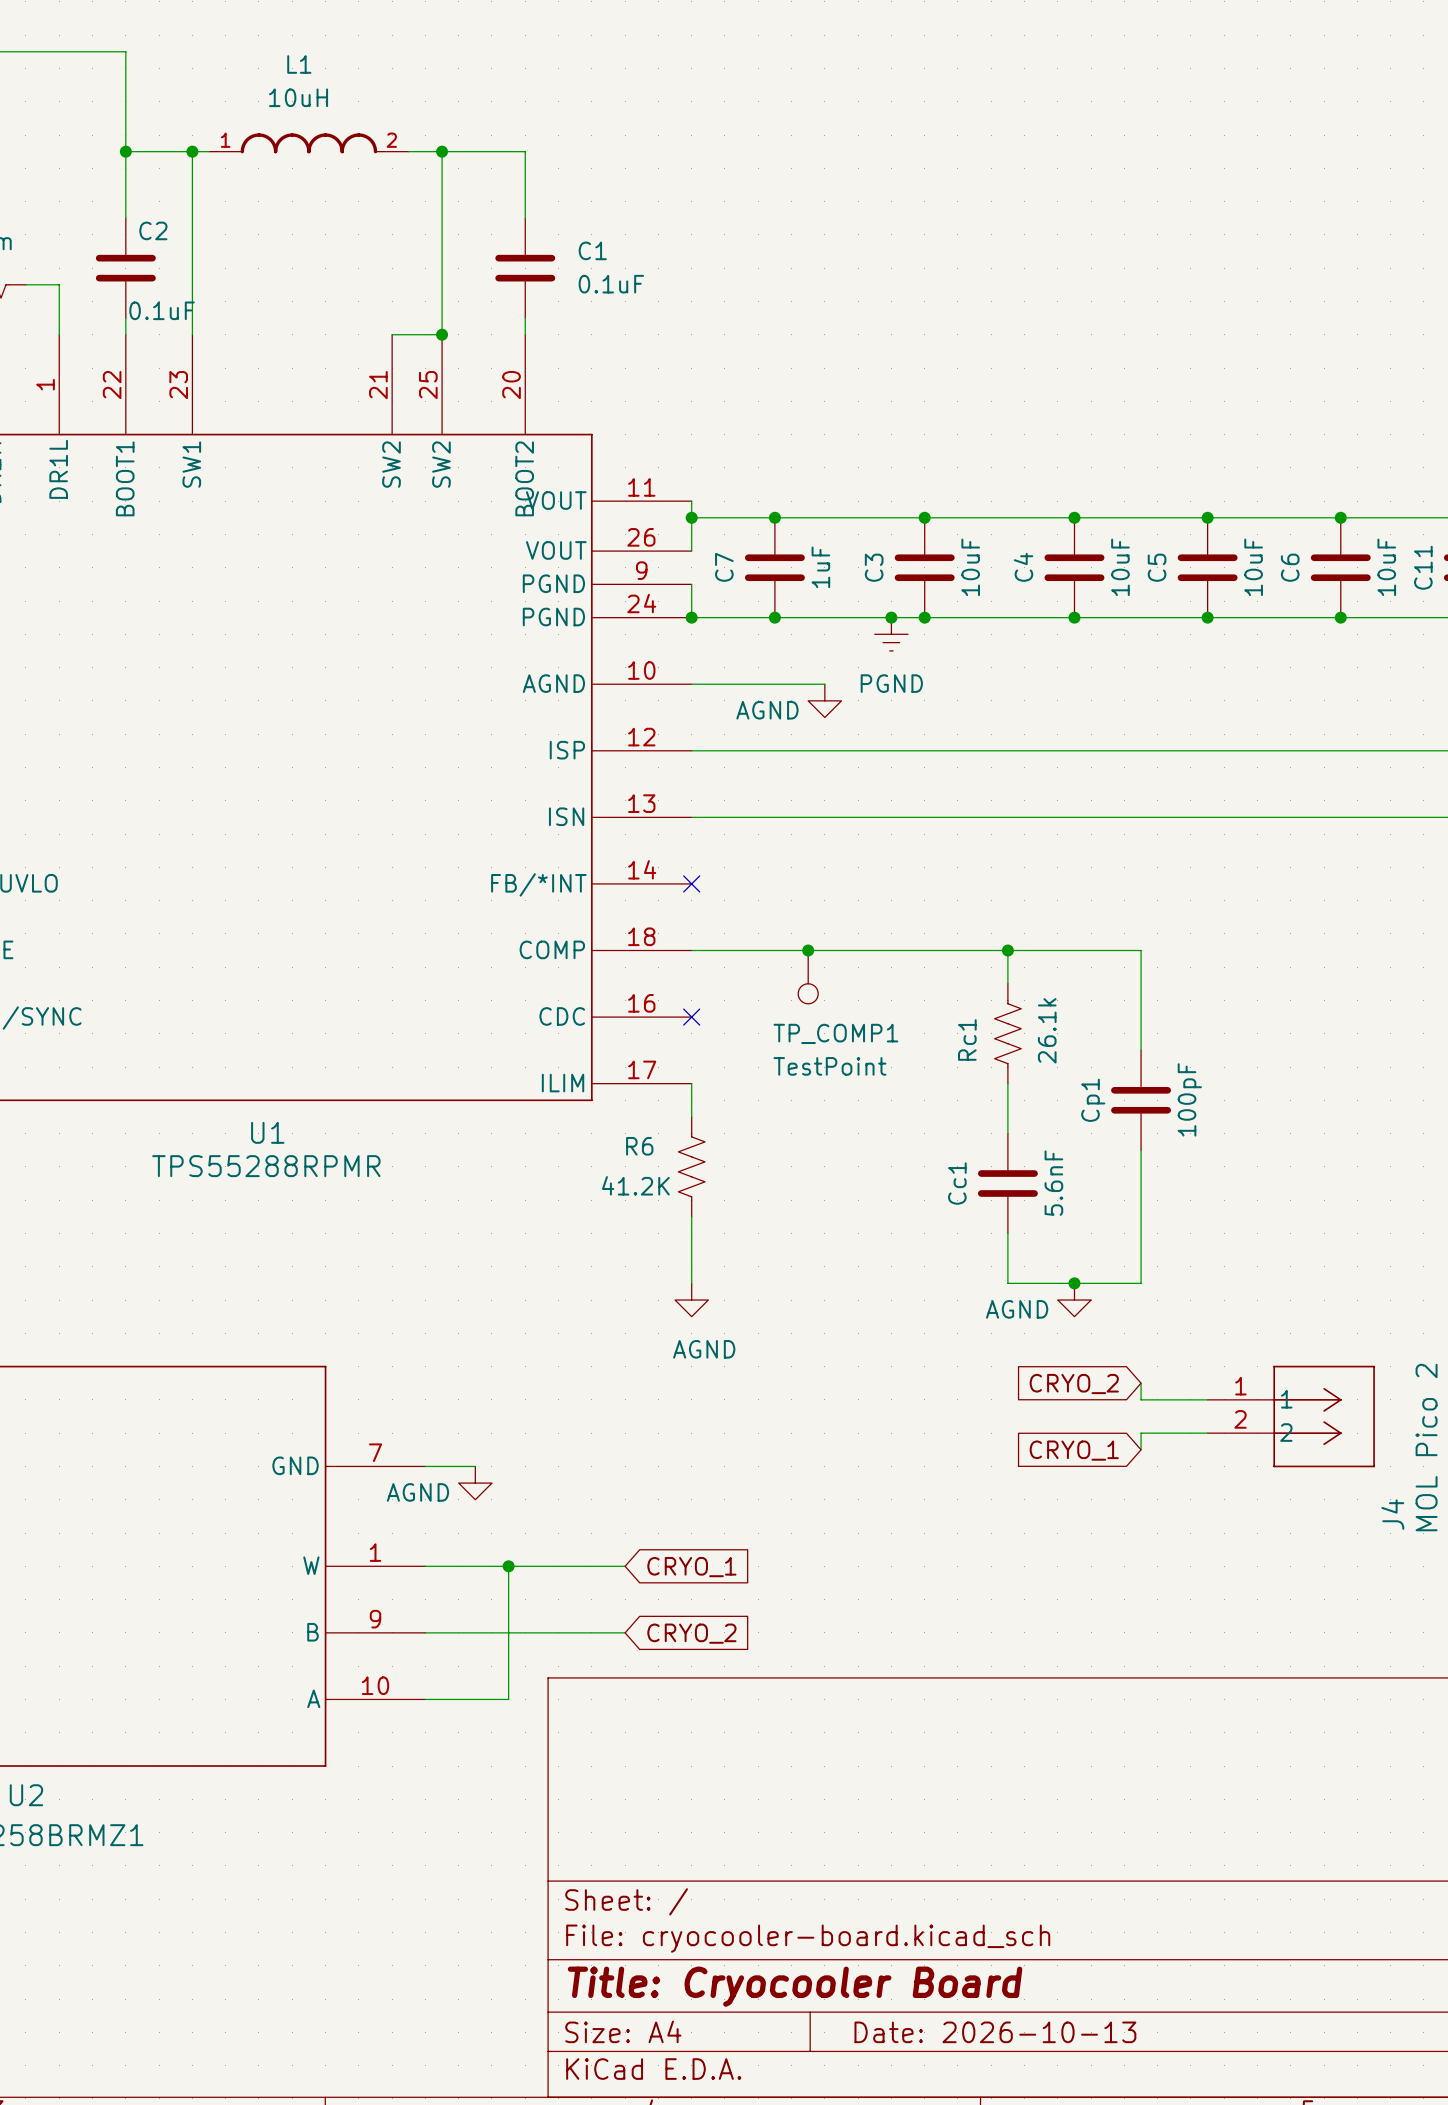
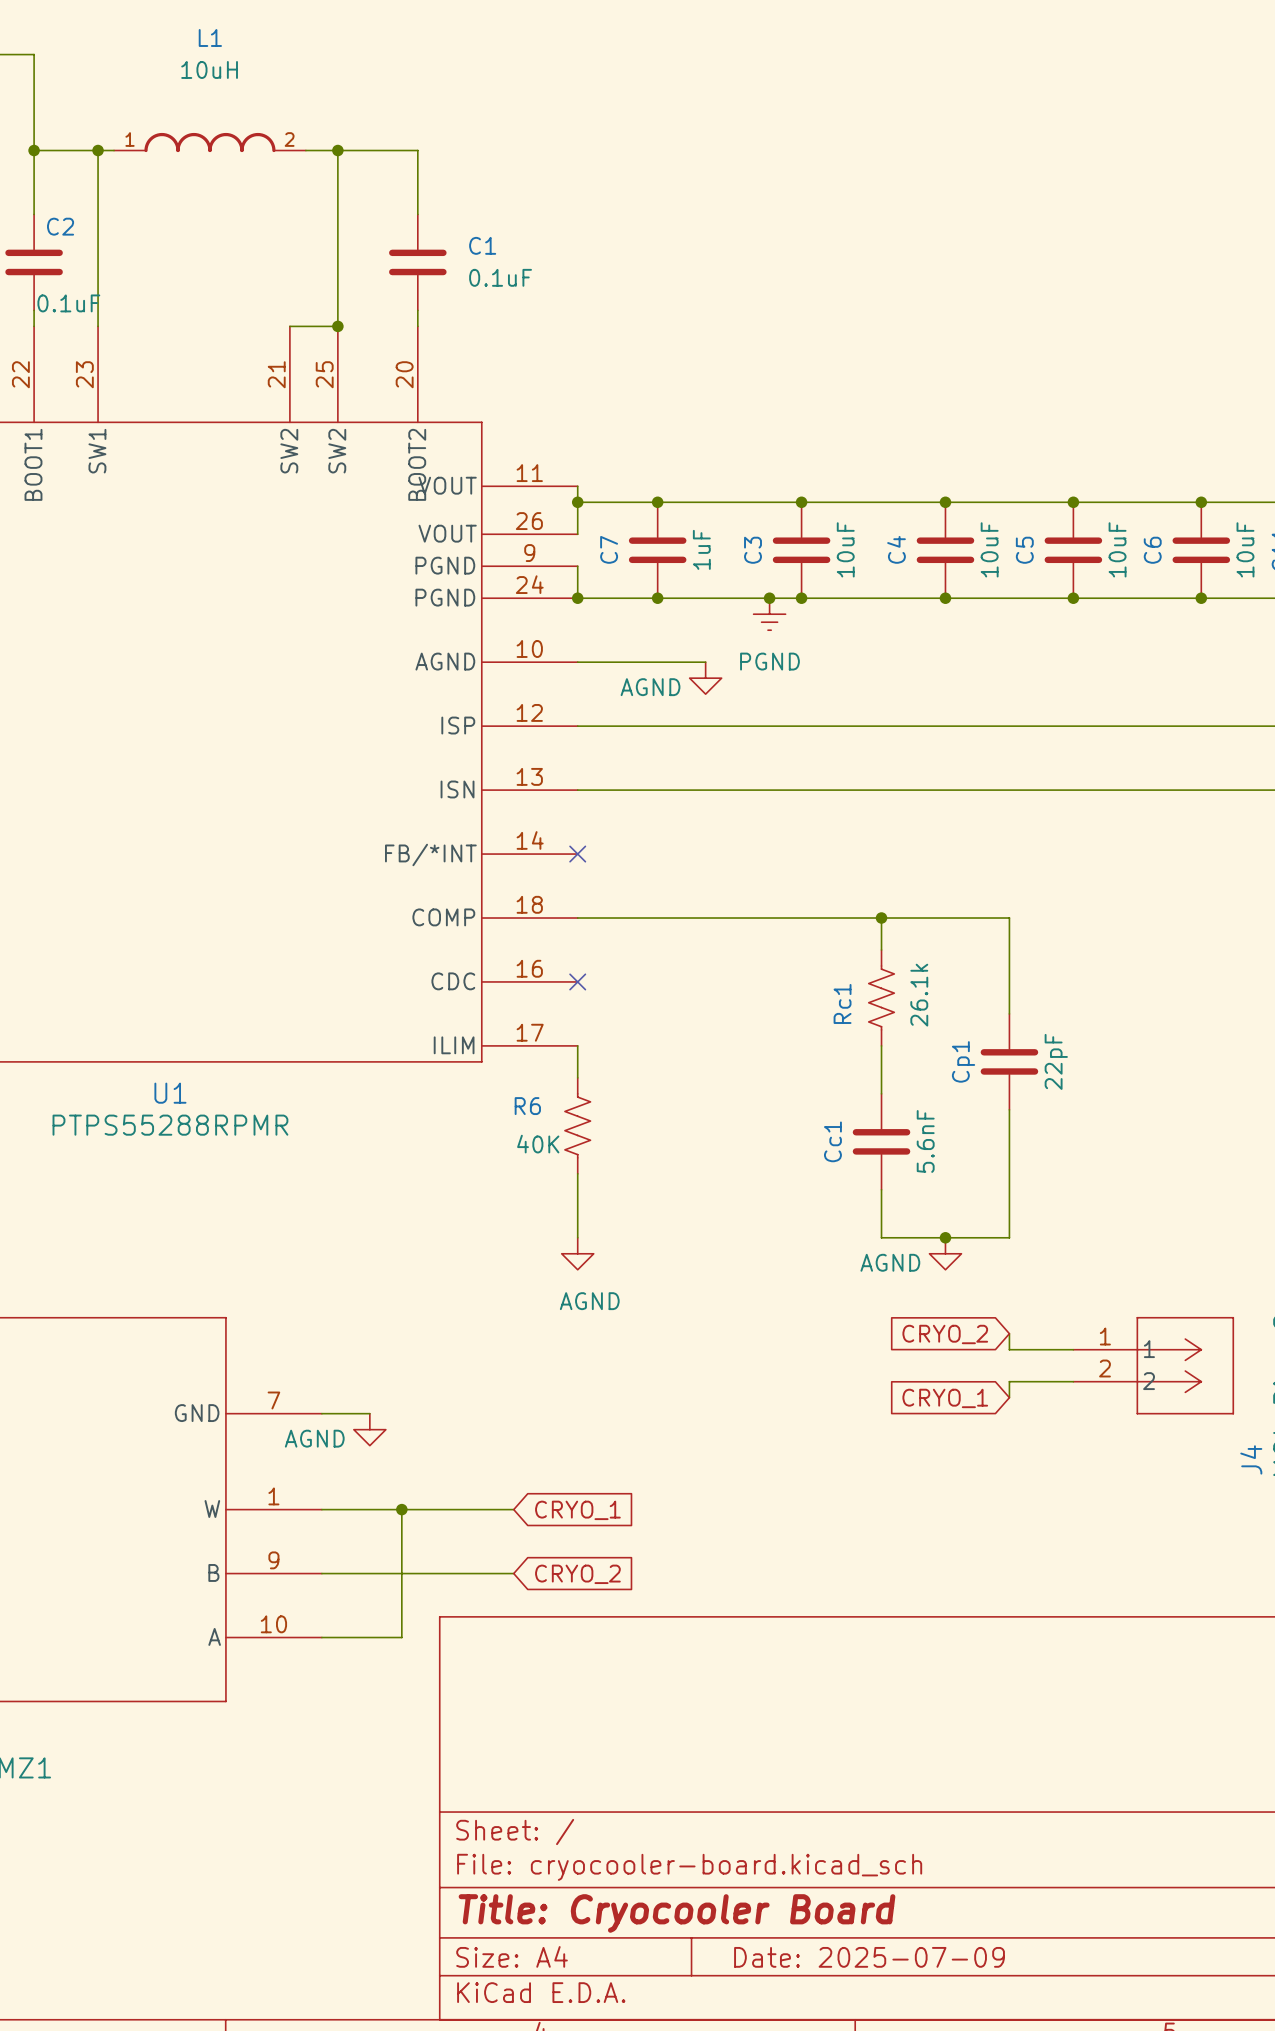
L1 name position: L1 (299, 64) -> L1 (210, 37)
L1 value position: 10uH (298, 97) -> 10uH (209, 69)
junction: (808, 950) -> none
TP_COMP1: TestPoint (808, 977) -> none
Cp1 value: 100pF (1189, 1099) -> 22pF (1056, 1061)
U1 value: TPS55288RPMR (266, 1166) -> PTPS55288RPMR (170, 1125)
R6 value: 41.2K (635, 1185) -> 40K (538, 1144)
title block: Date: 2026-10-13 (995, 2032) -> Date: 2025-07-09 (869, 1957)

